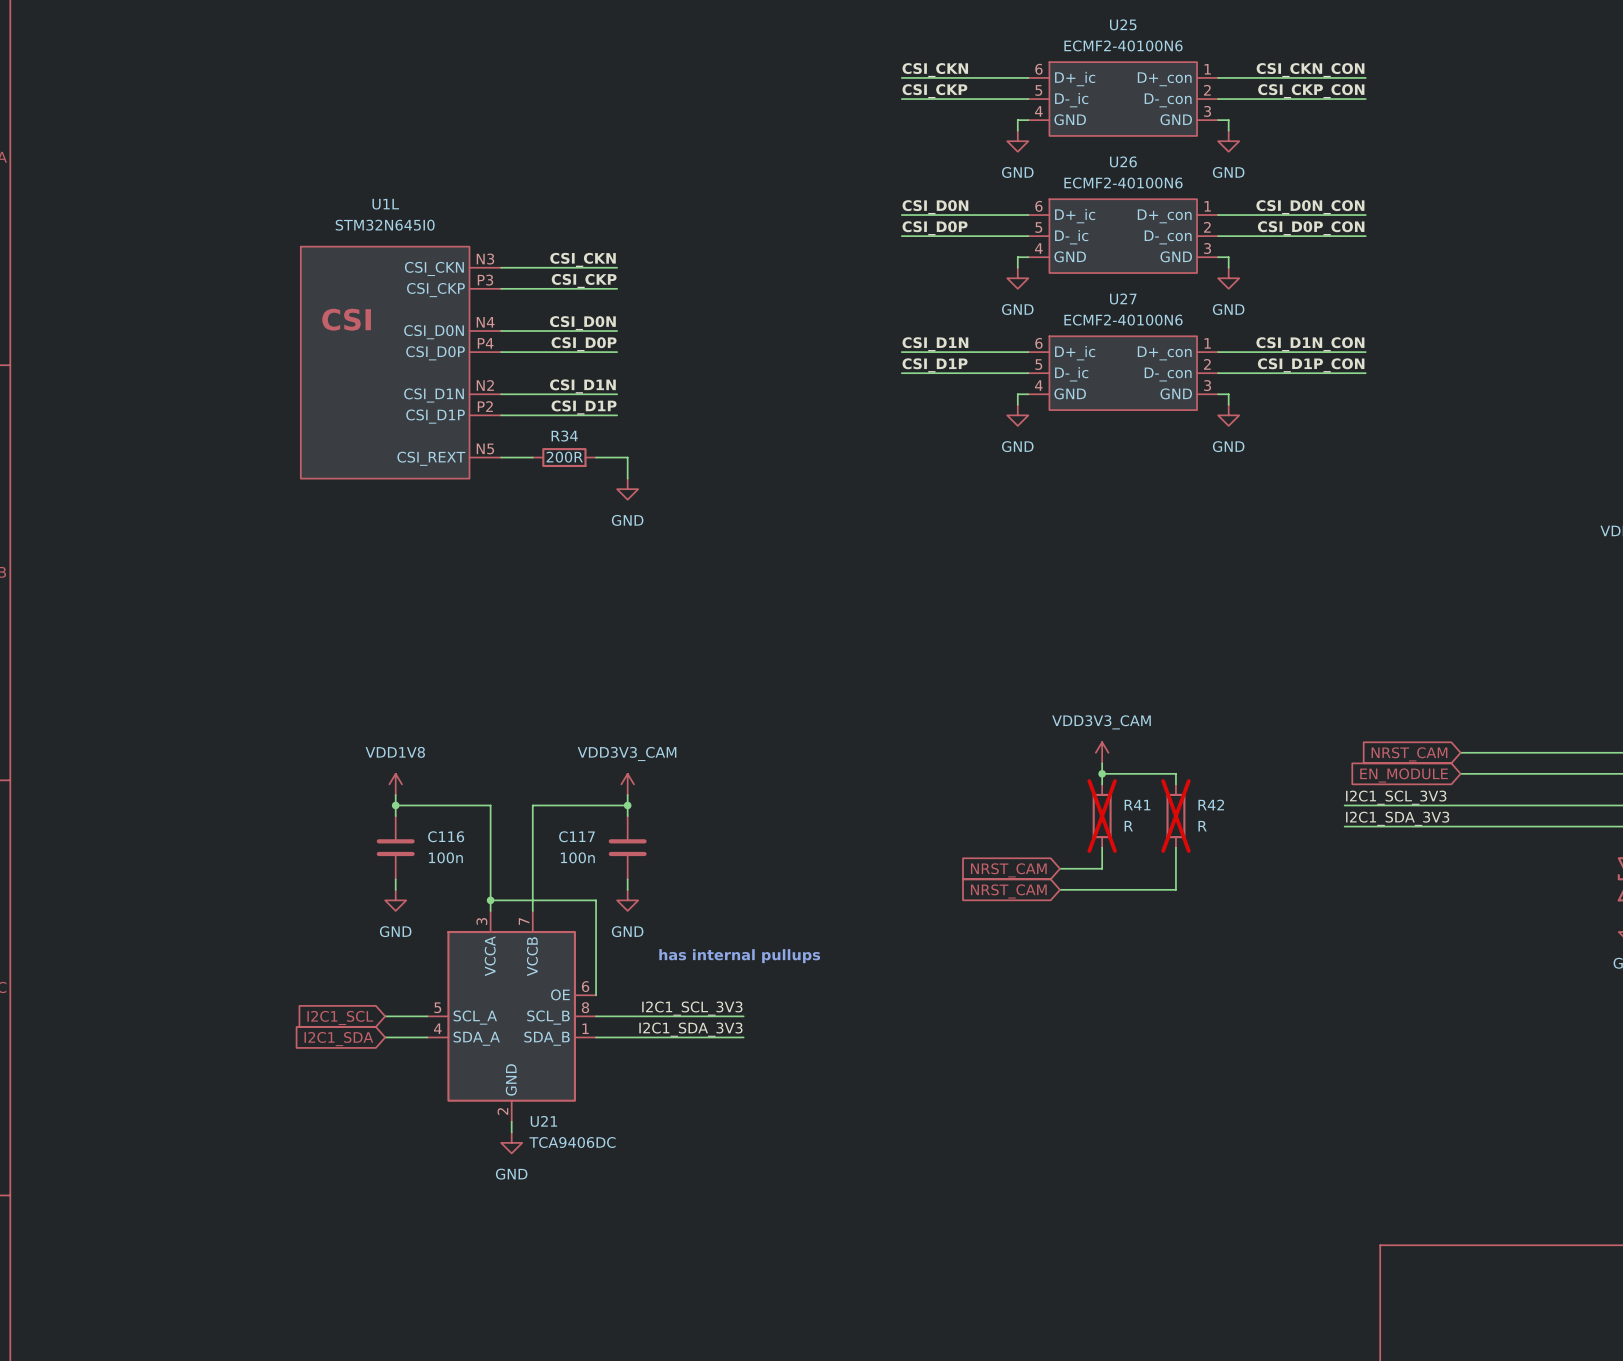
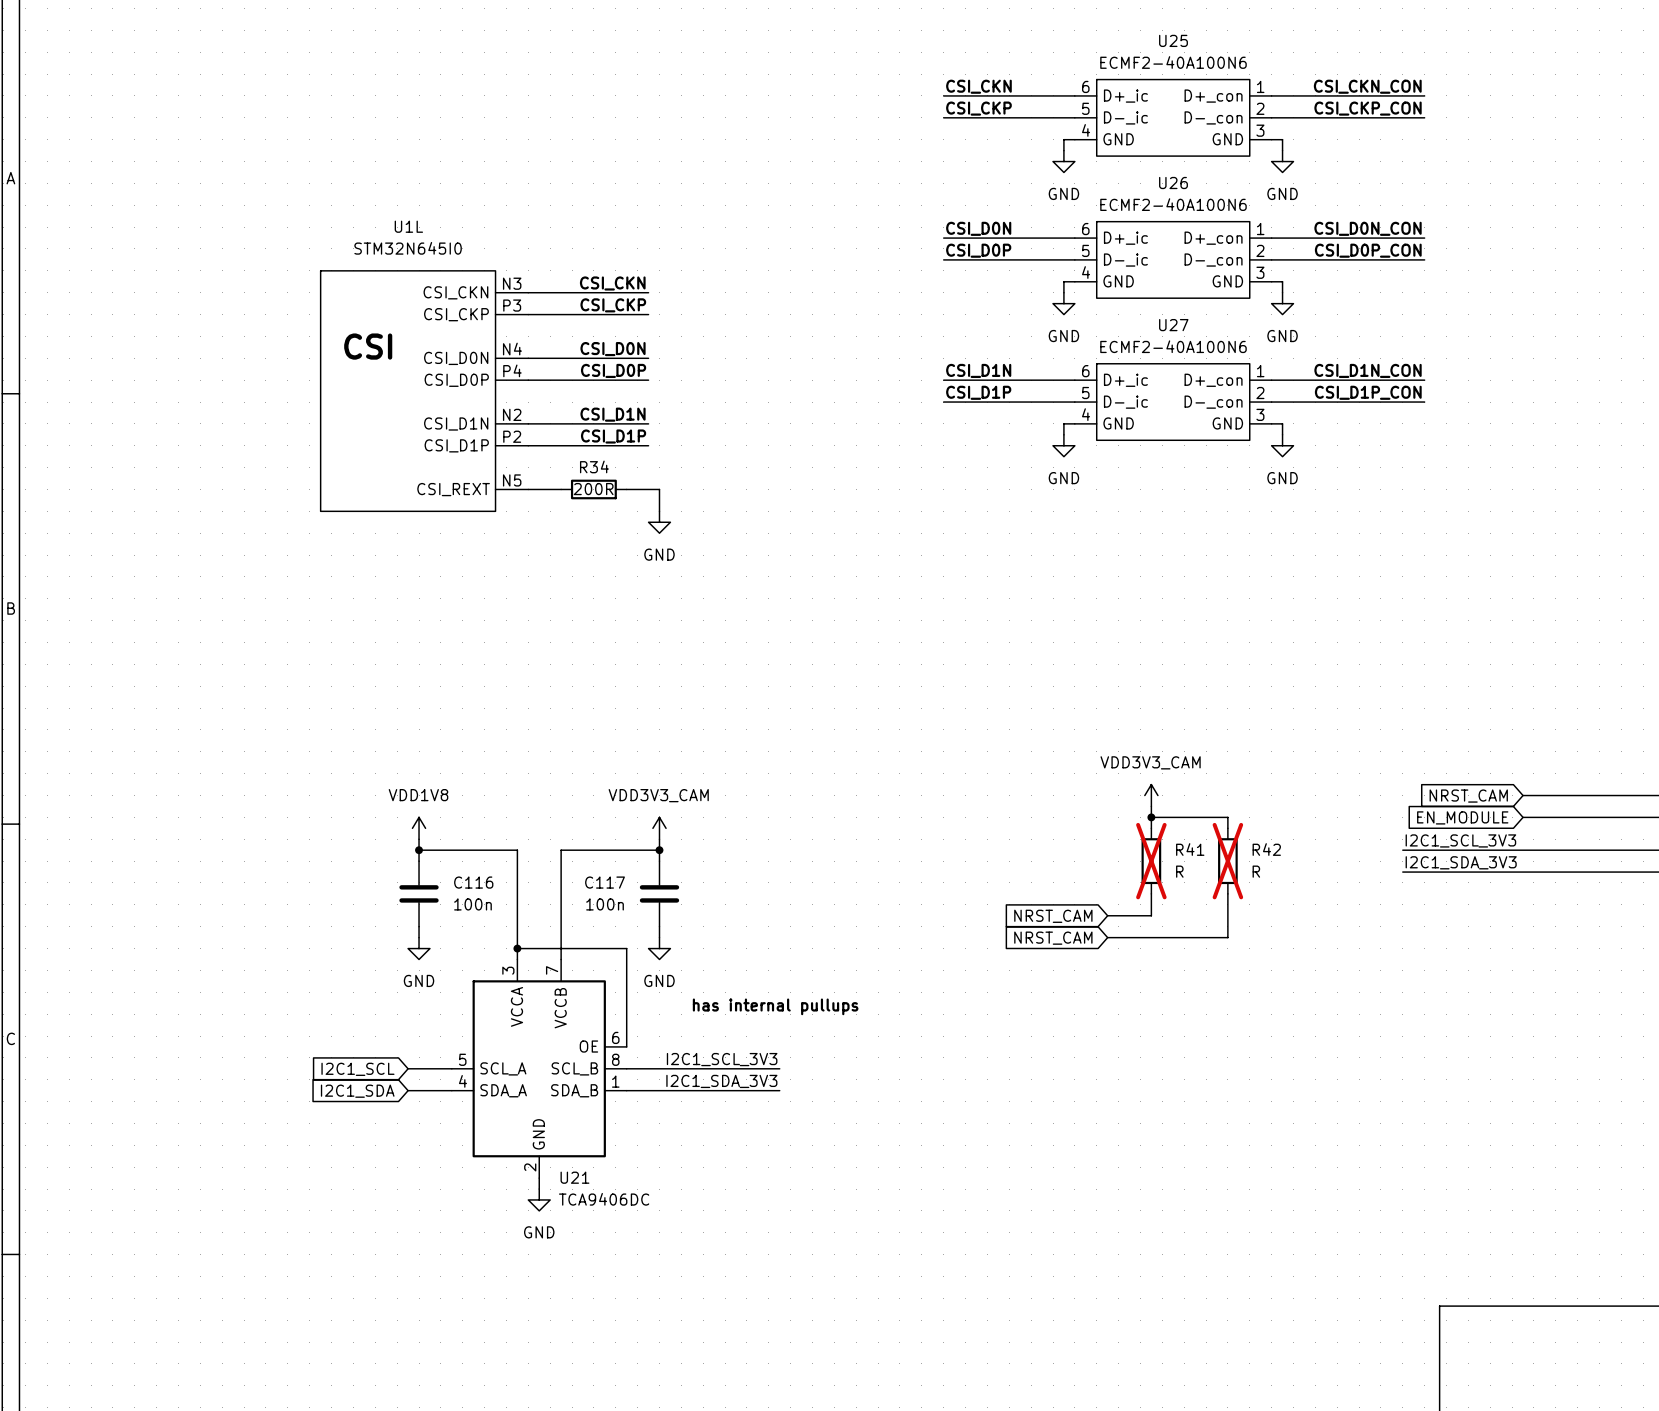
U25 value: ECMF2-40100N6 (1123, 45) -> ECMF2-40A100N6 (1173, 62)
U26 value: ECMF2-40100N6 (1123, 183) -> ECMF2-40A100N6 (1173, 204)
U27 value: ECMF2-40100N6 (1123, 320) -> ECMF2-40A100N6 (1173, 346)

